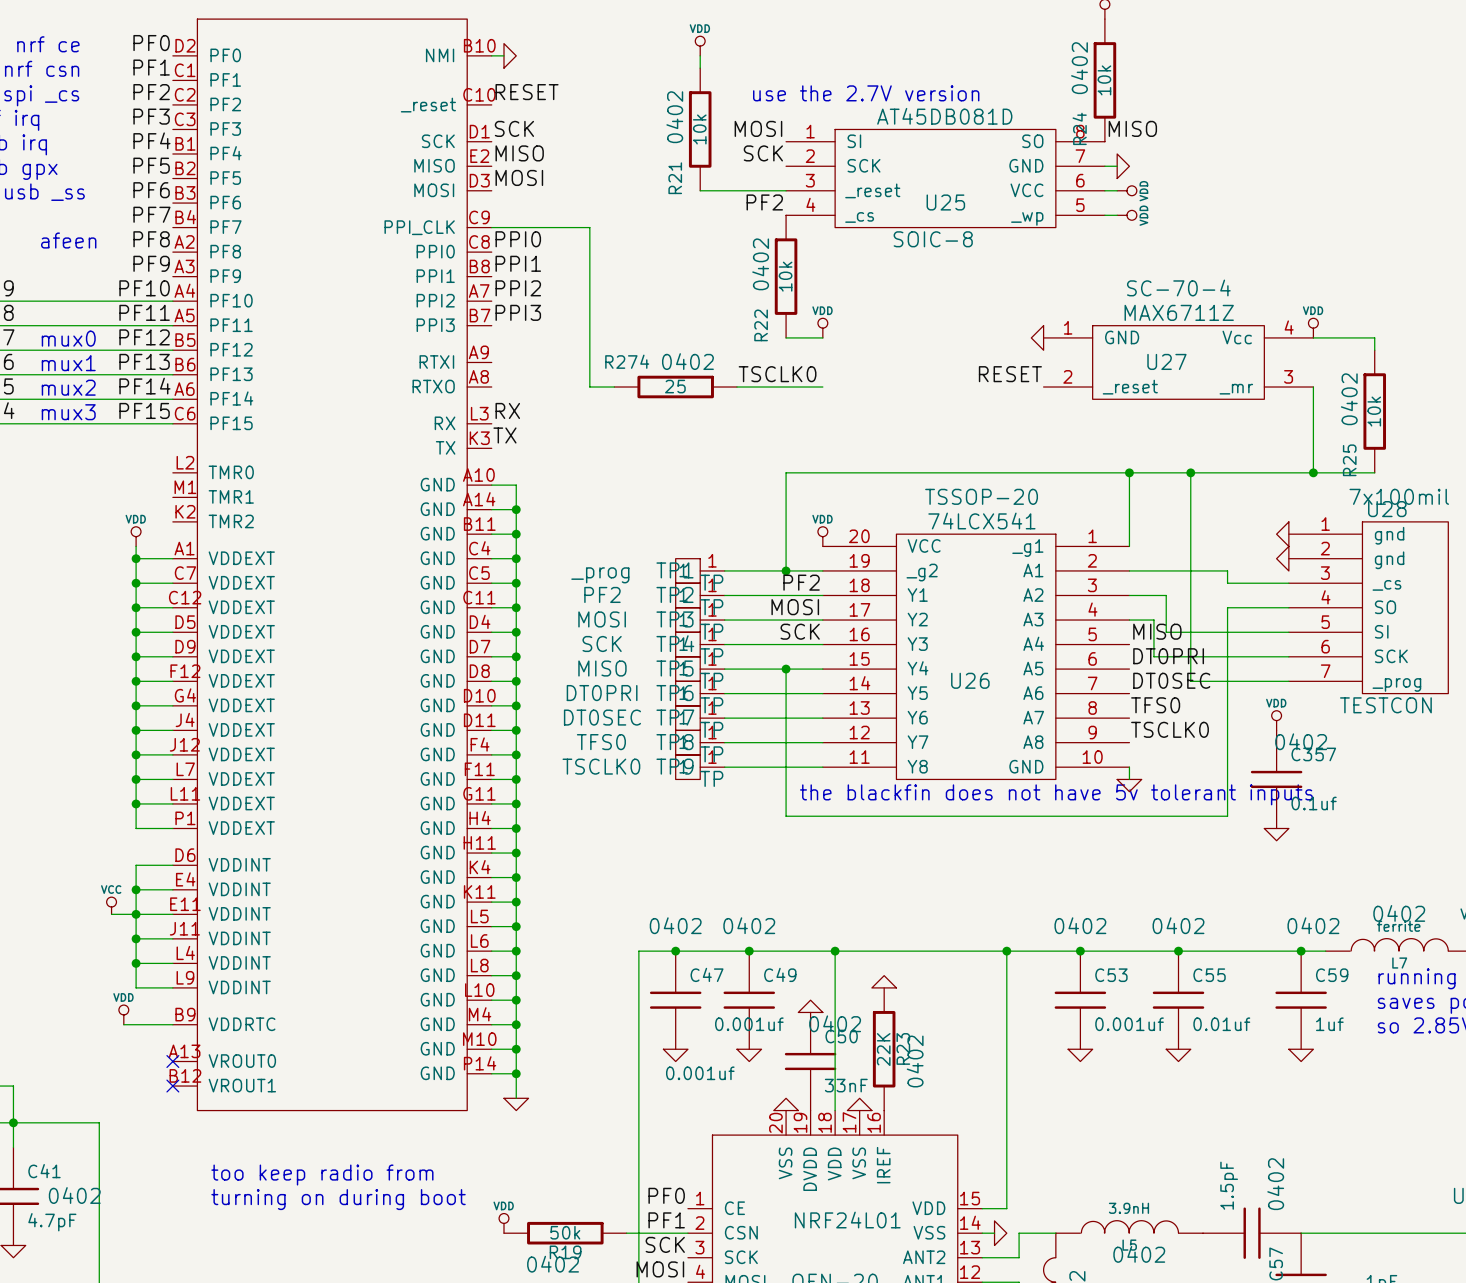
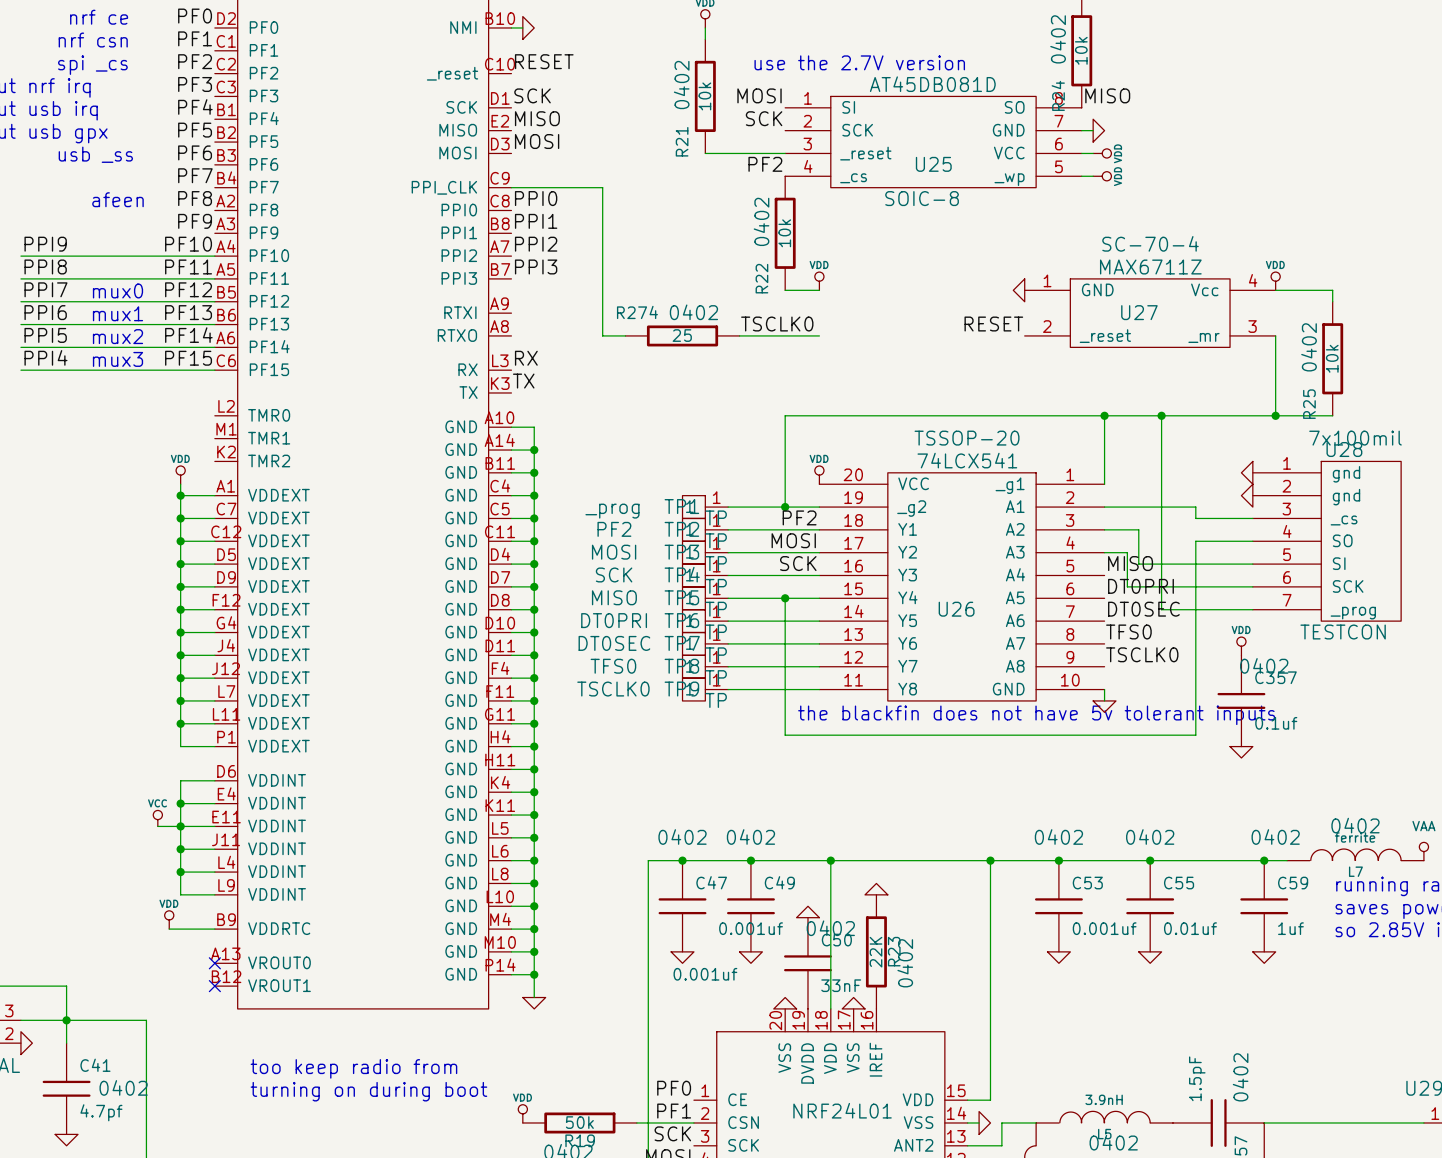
C41 value: 4.7pF (52, 1222) -> 4.7pf (101, 1112)

